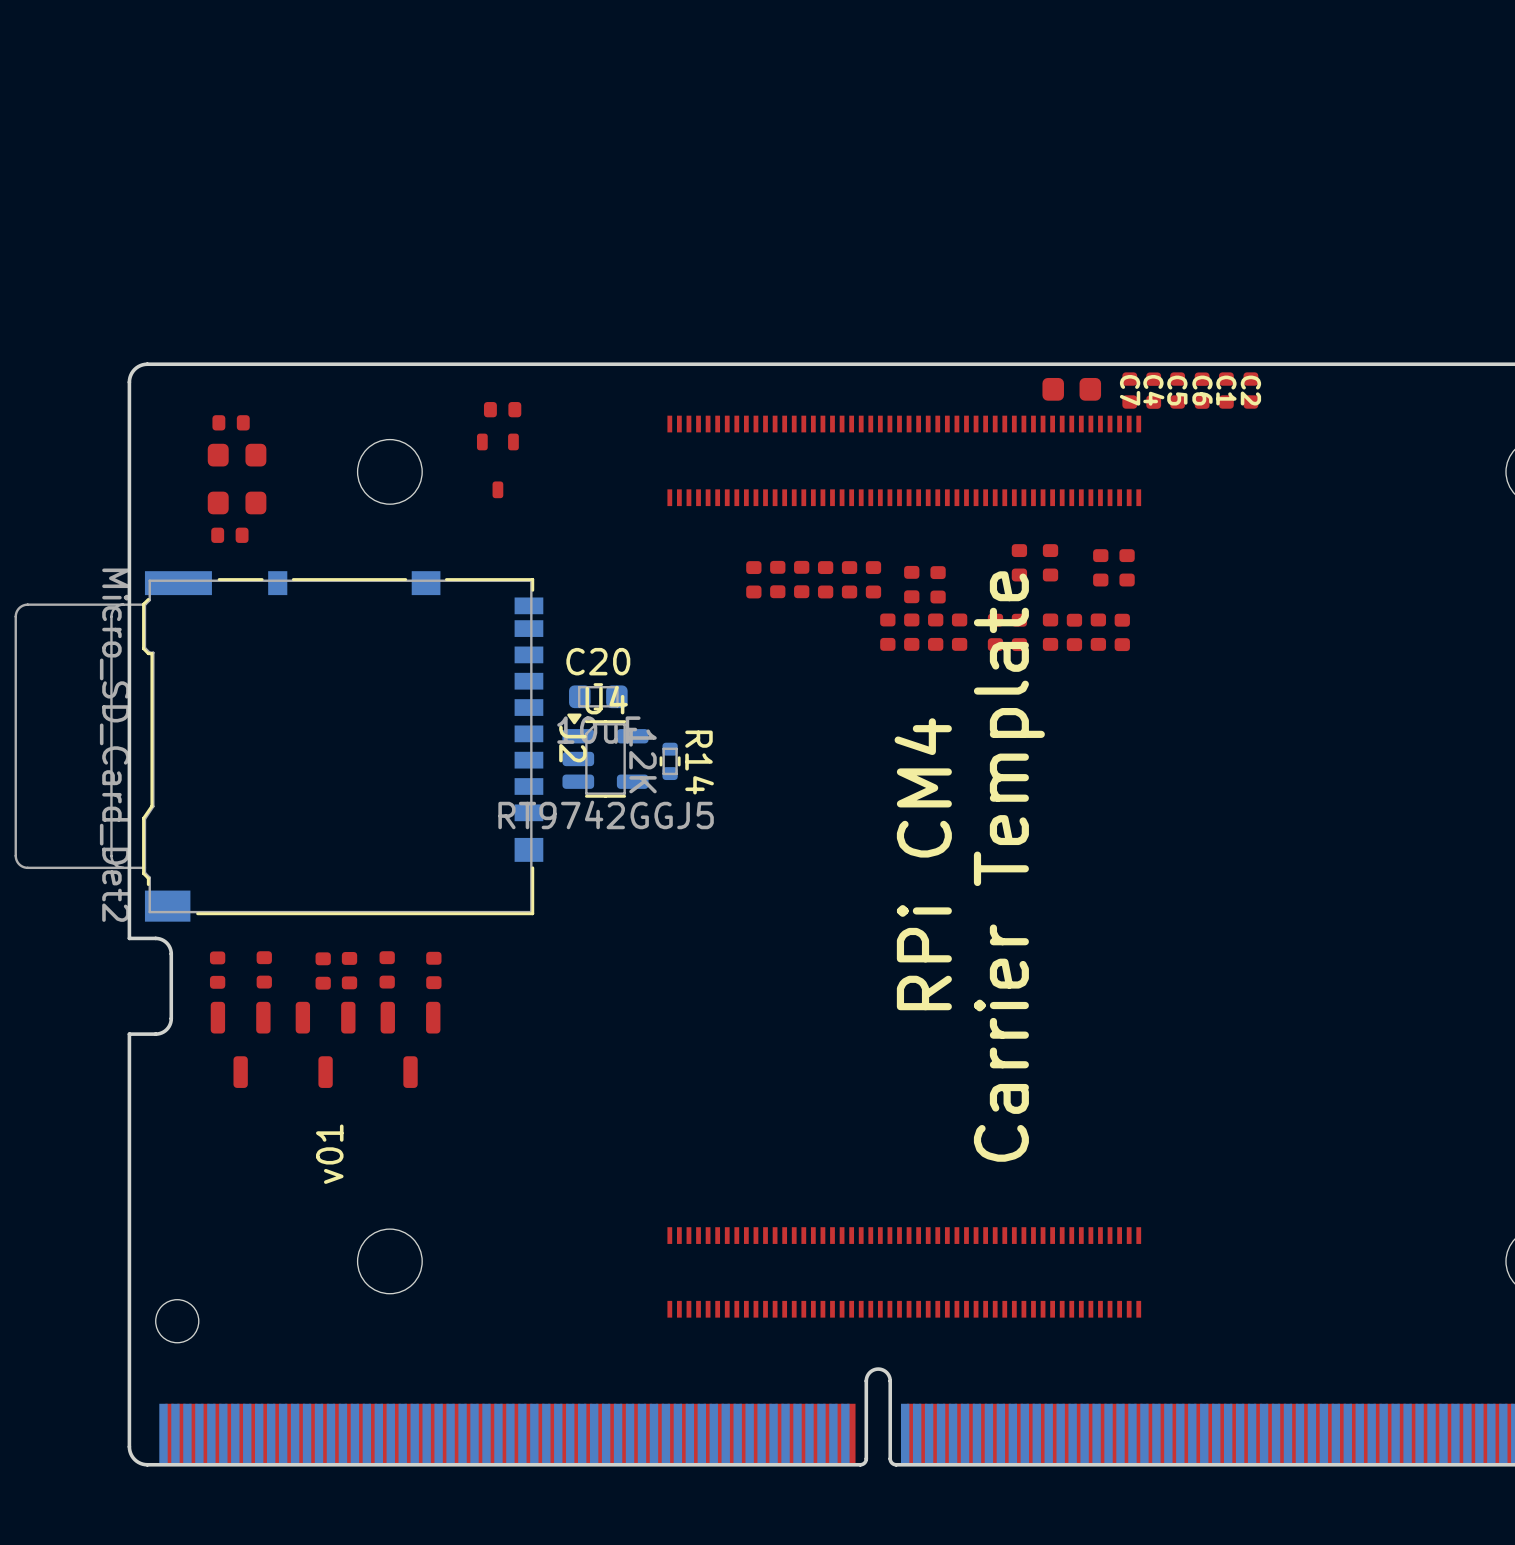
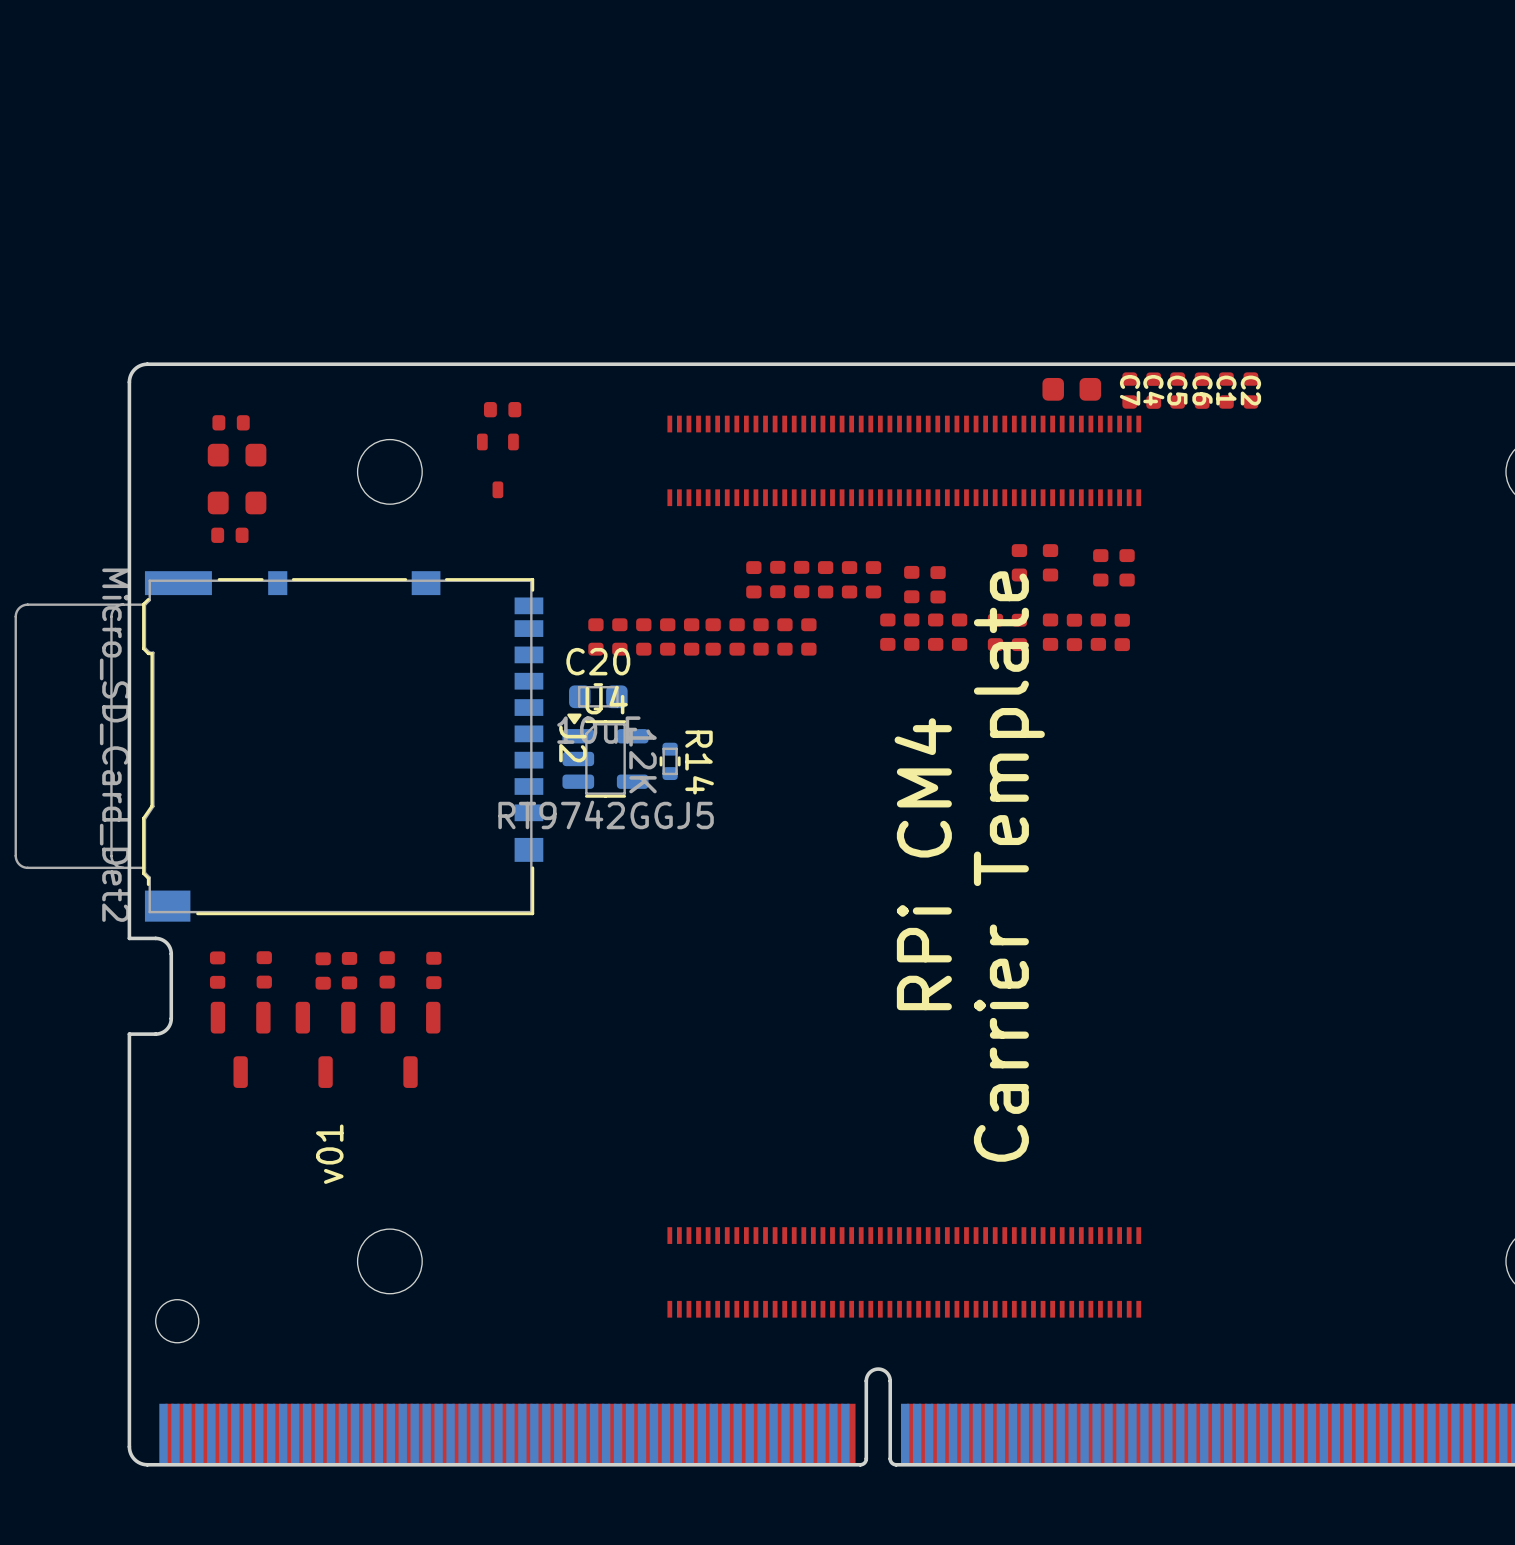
part: none -> (595, 636)
part: none -> (619, 636)
part: none -> (643, 636)
part: none -> (667, 636)
part: none -> (691, 636)
part: none -> (713, 636)
part: none -> (737, 636)
part: none -> (761, 636)
part: none -> (784, 636)
part: none -> (808, 636)

